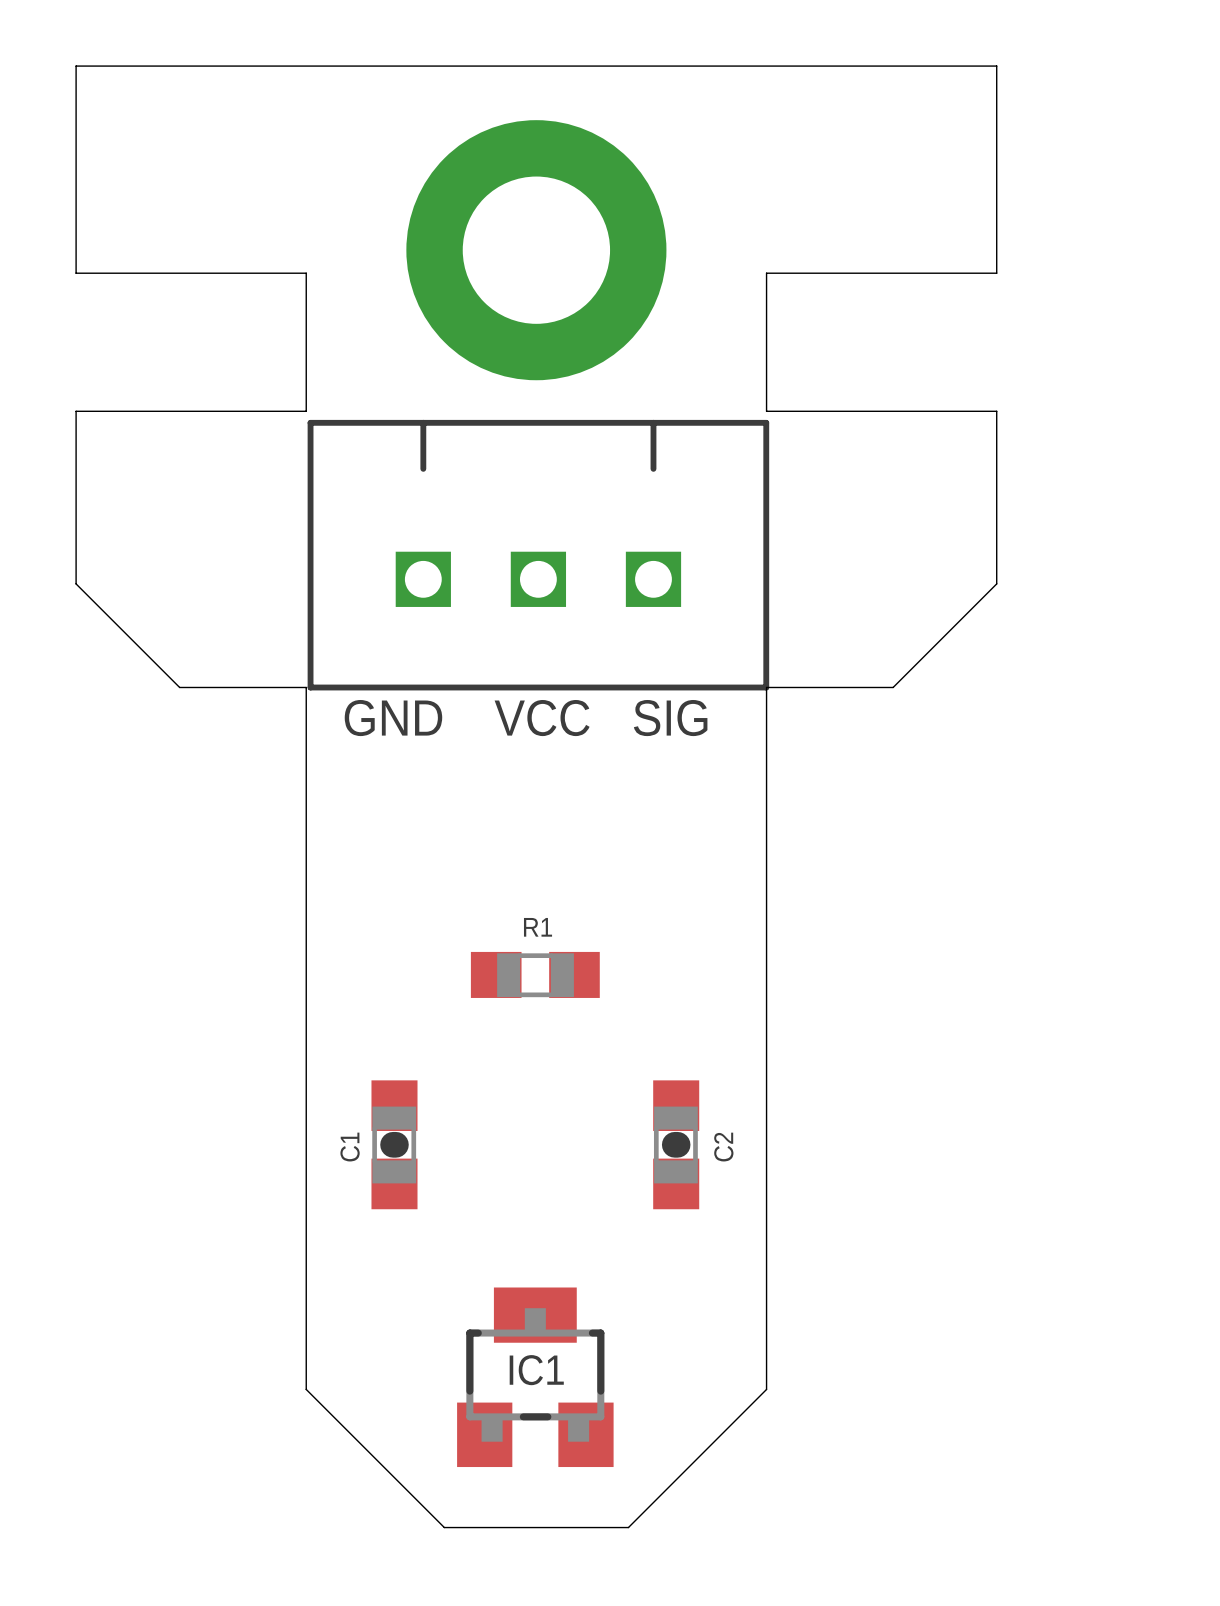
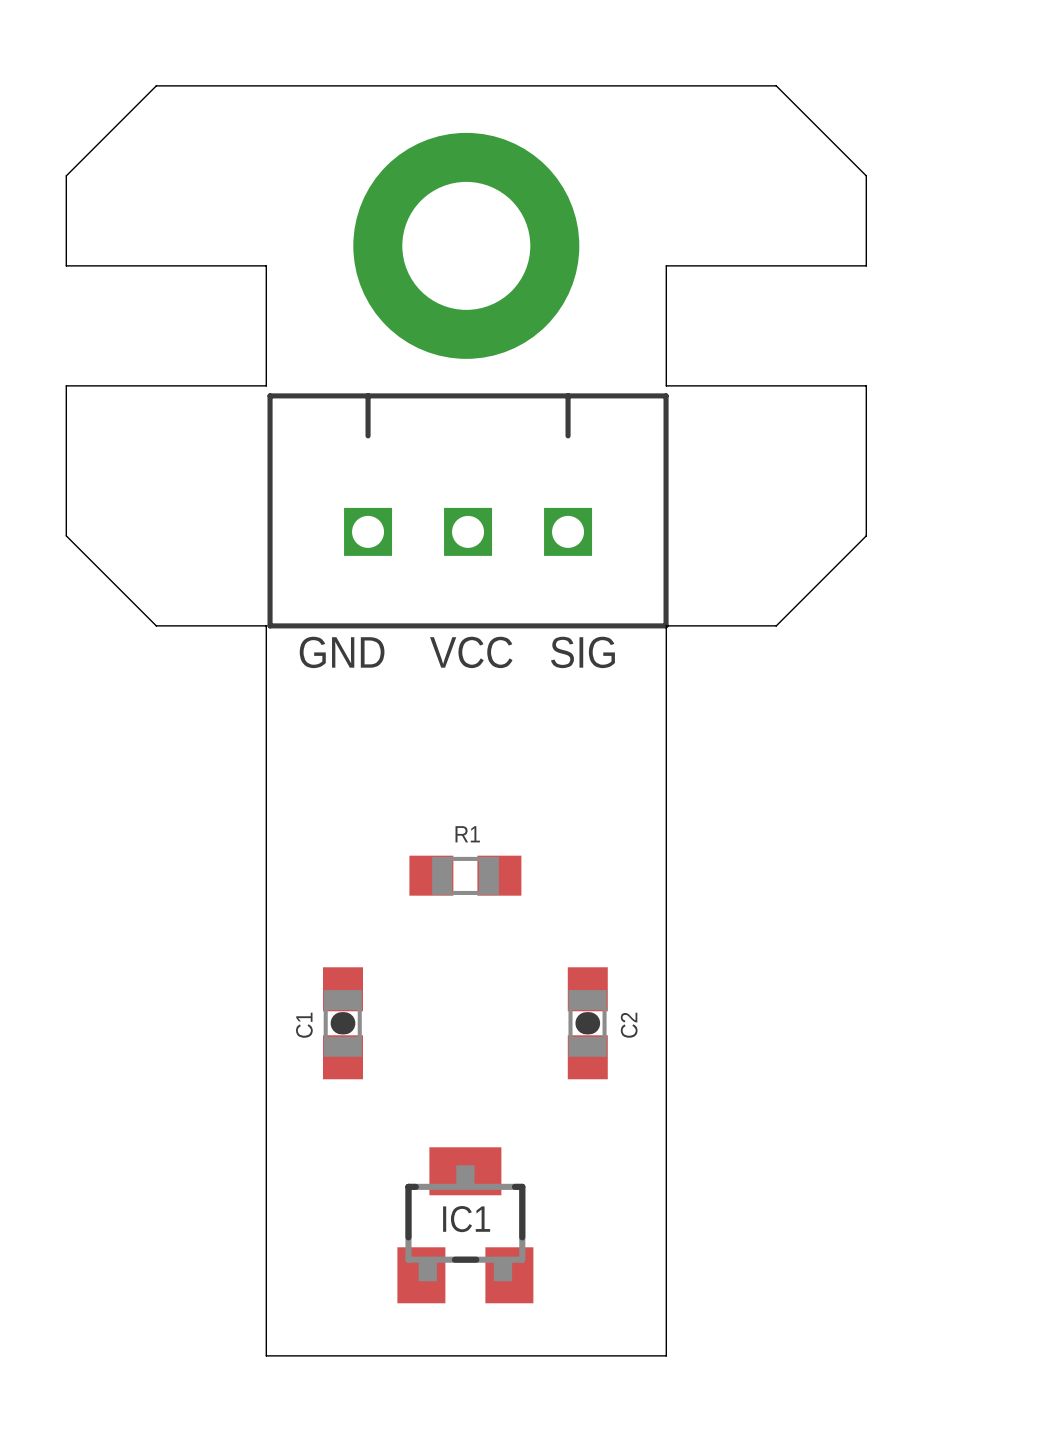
board edge: (179, 66) (76, 66) (76, 169) -> (156, 85) (66, 175)
board edge: (893, 66) (996, 66) (996, 169) -> (776, 85) (866, 175)
board edge: (306, 1389) (444, 1527) -> (266, 1235) (266, 1355) (386, 1355)
board edge: (766, 1389) (628, 1527) -> (666, 1235) (666, 1355) (546, 1355)

